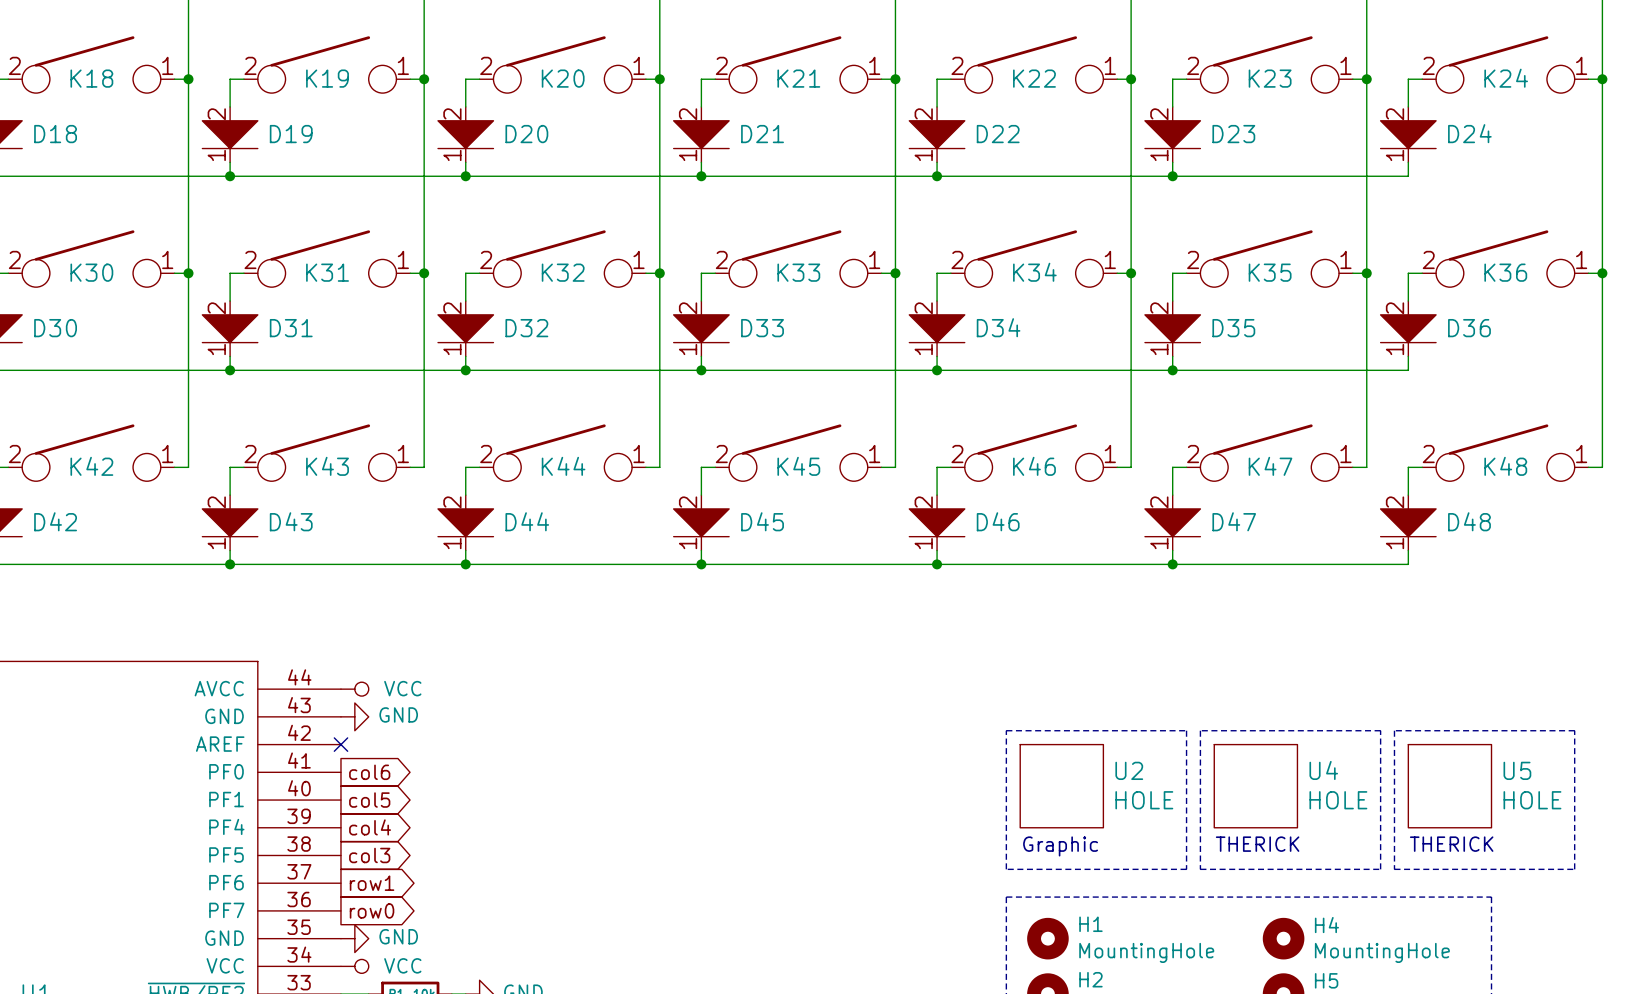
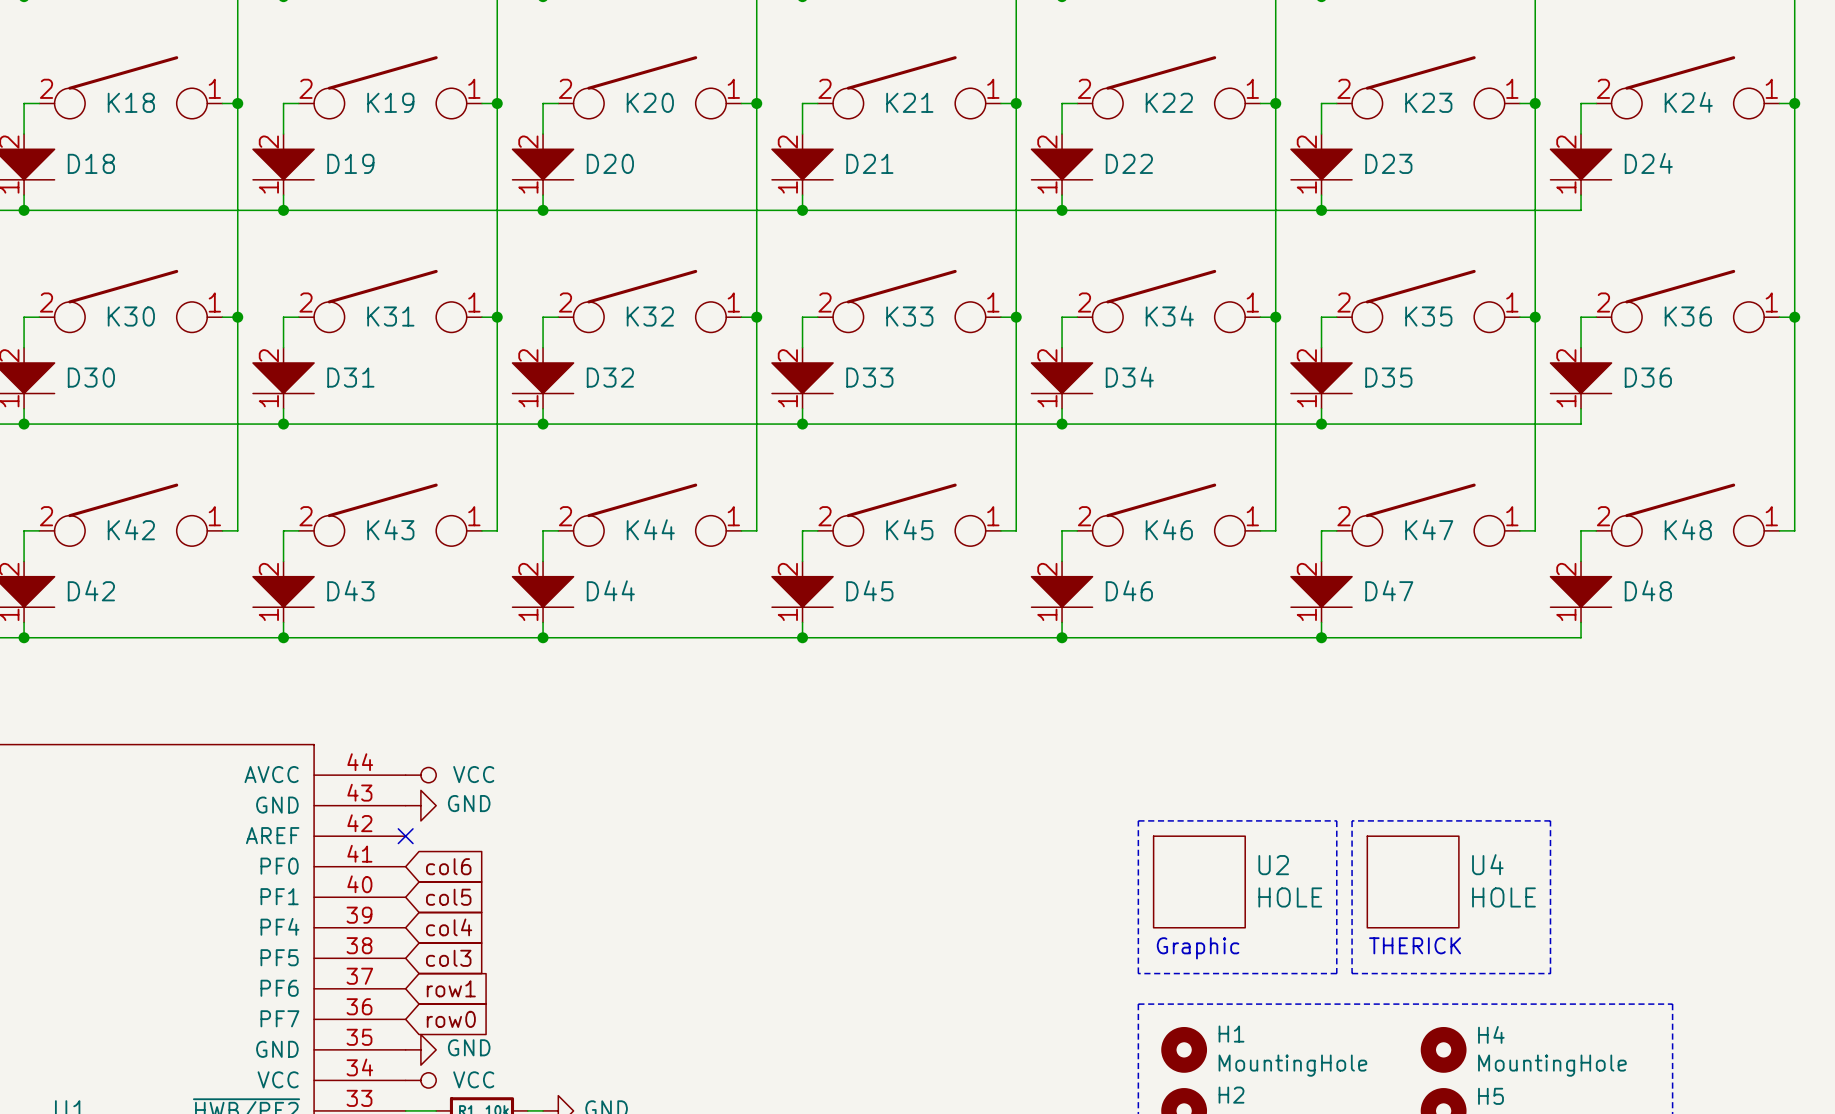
line: (1394, 730) (1394, 869) (1574, 869) (1574, 730) (1394, 730) -> none
global label shape: output (369, 772) -> input (448, 866)
U5: HOLE (1449, 786) -> none
global label shape: output (369, 800) -> input (448, 897)
global label shape: output (370, 827) -> input (449, 927)
text: THERICK (1451, 844) -> none
global label shape: output (369, 855) -> input (448, 958)
global label shape: output (372, 883) -> input (451, 988)
global label shape: output (372, 910) -> input (451, 1019)

